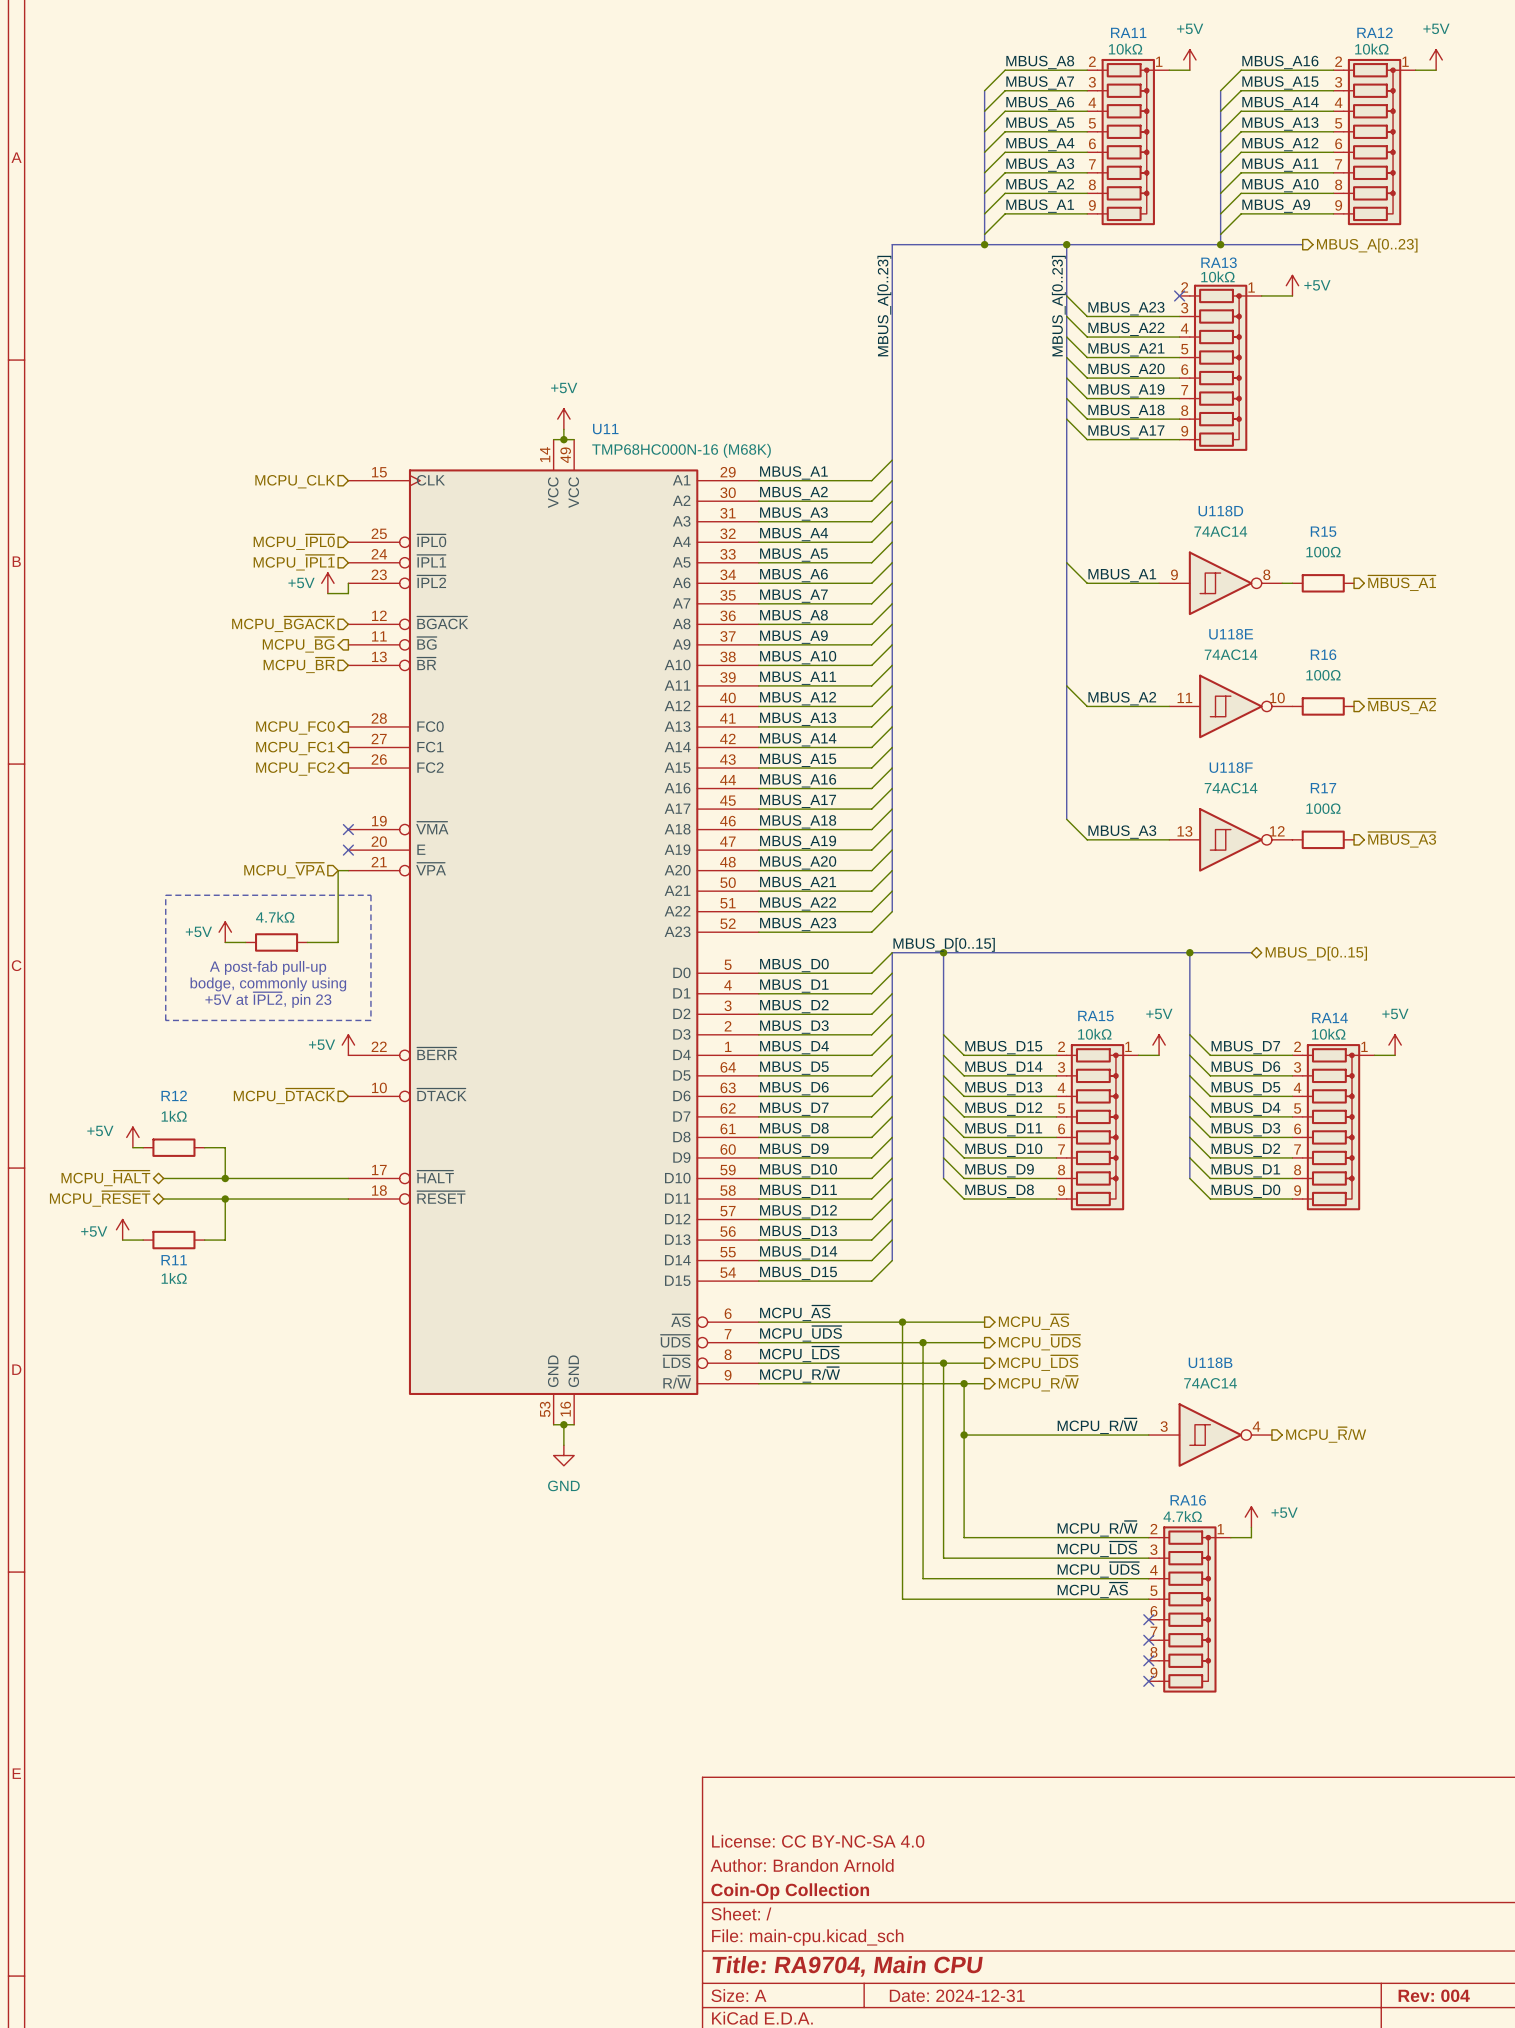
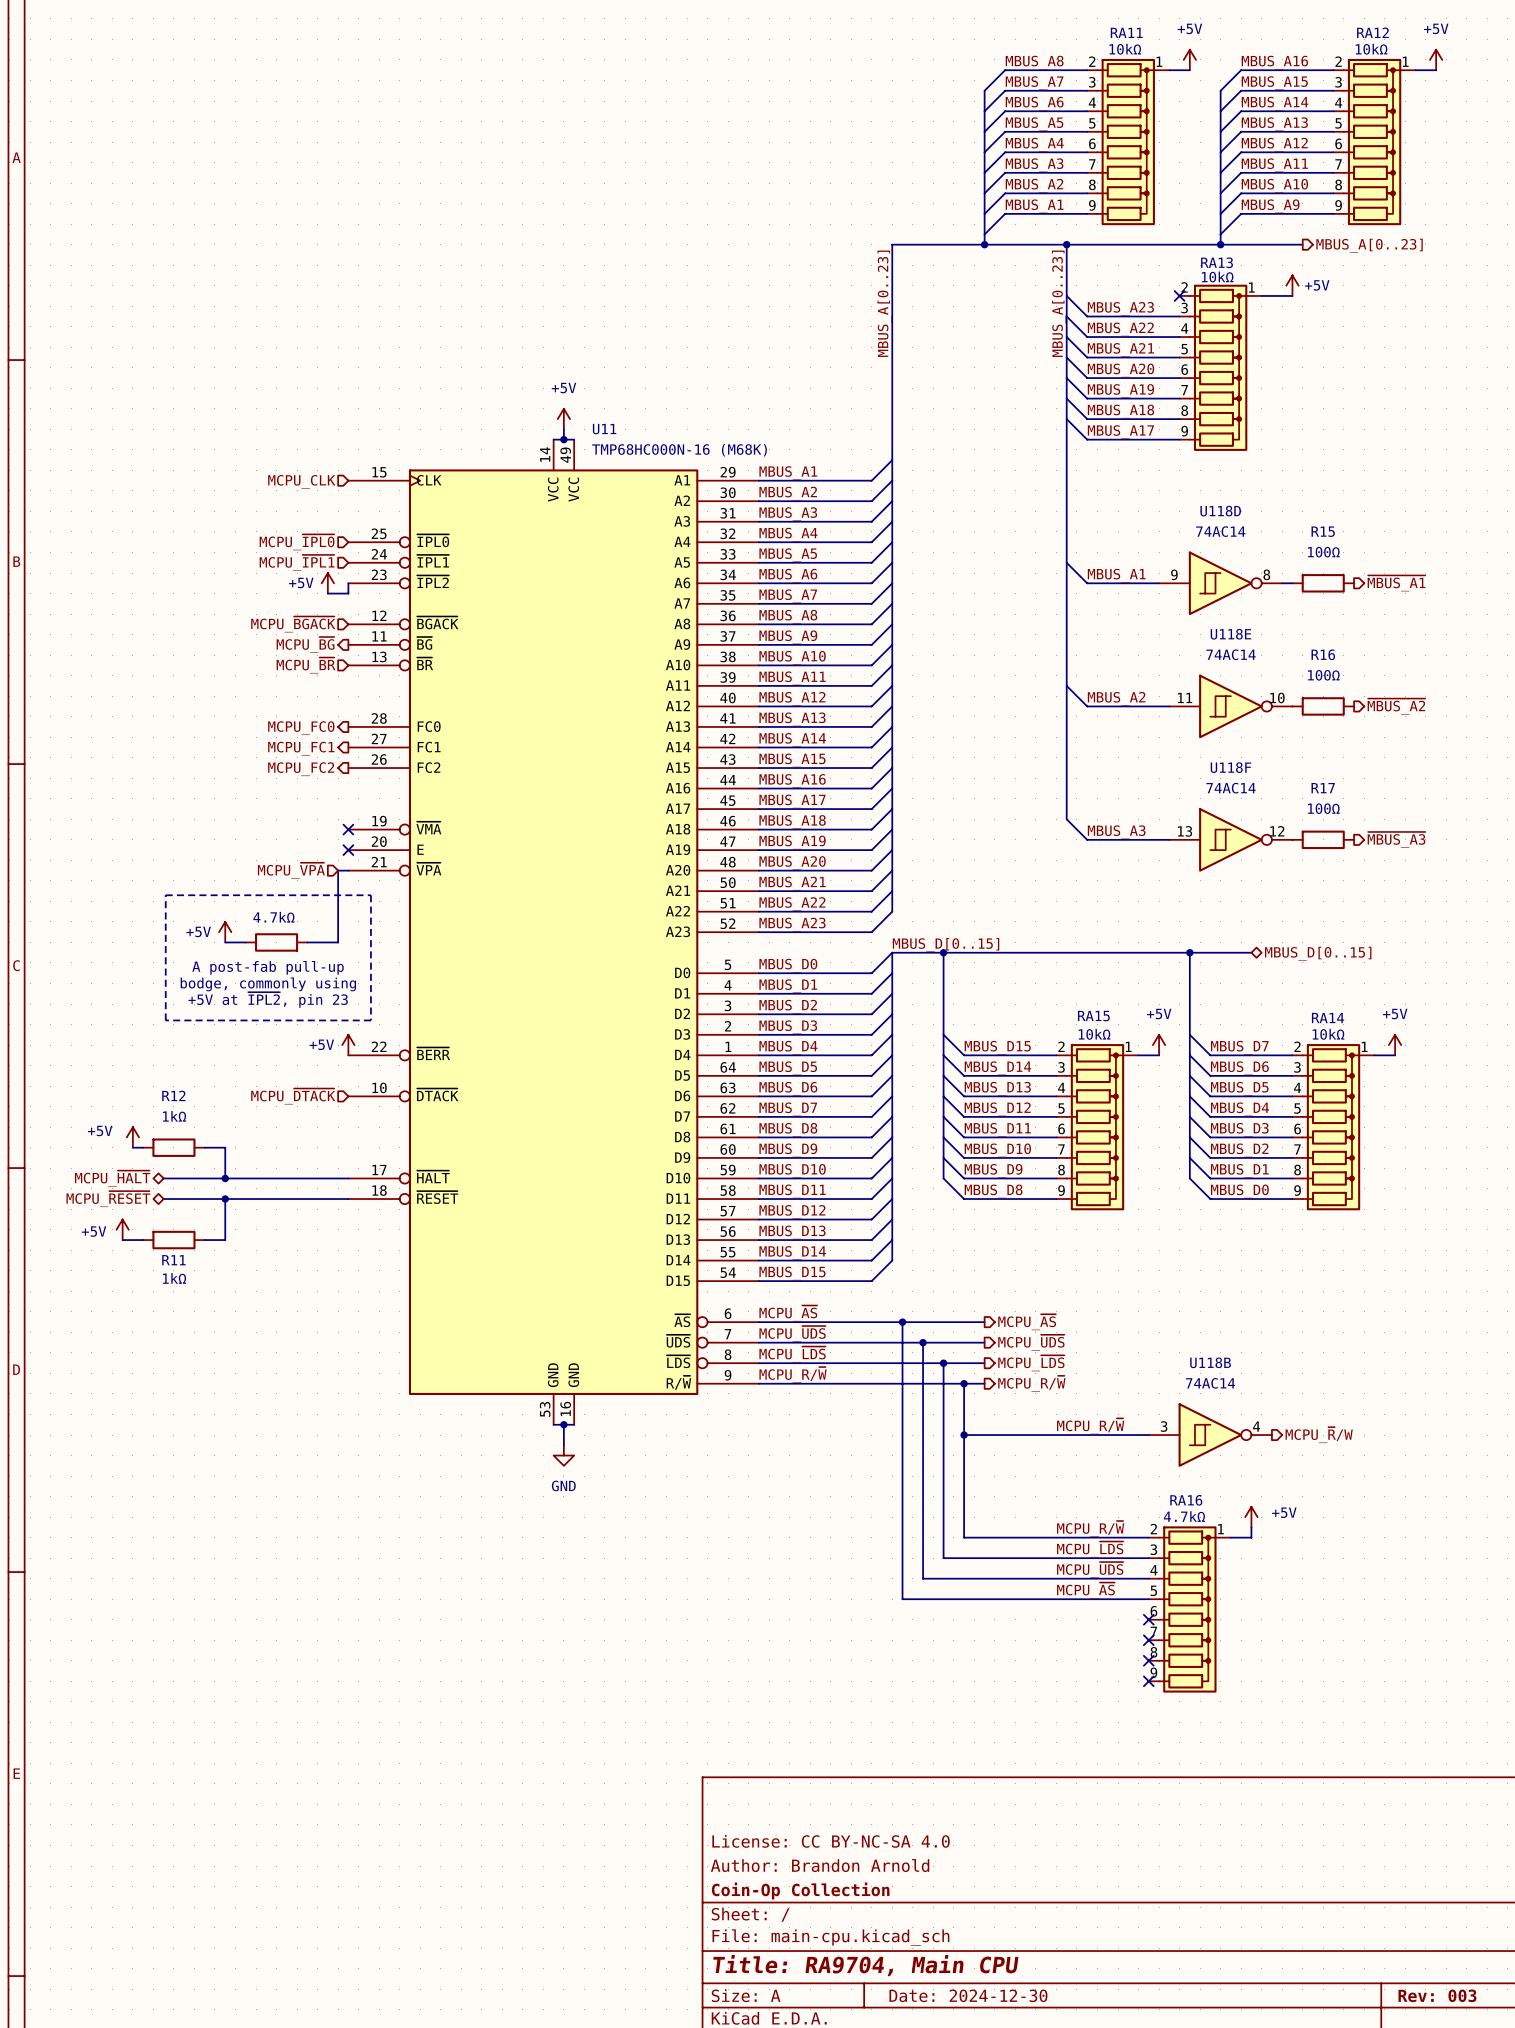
title block: Date: 2024-12-31 (957, 1995) -> Date: 2024-12-30 (968, 1995)
title block: Rev: 004 (1434, 1995) -> Rev: 003 (1437, 1995)

